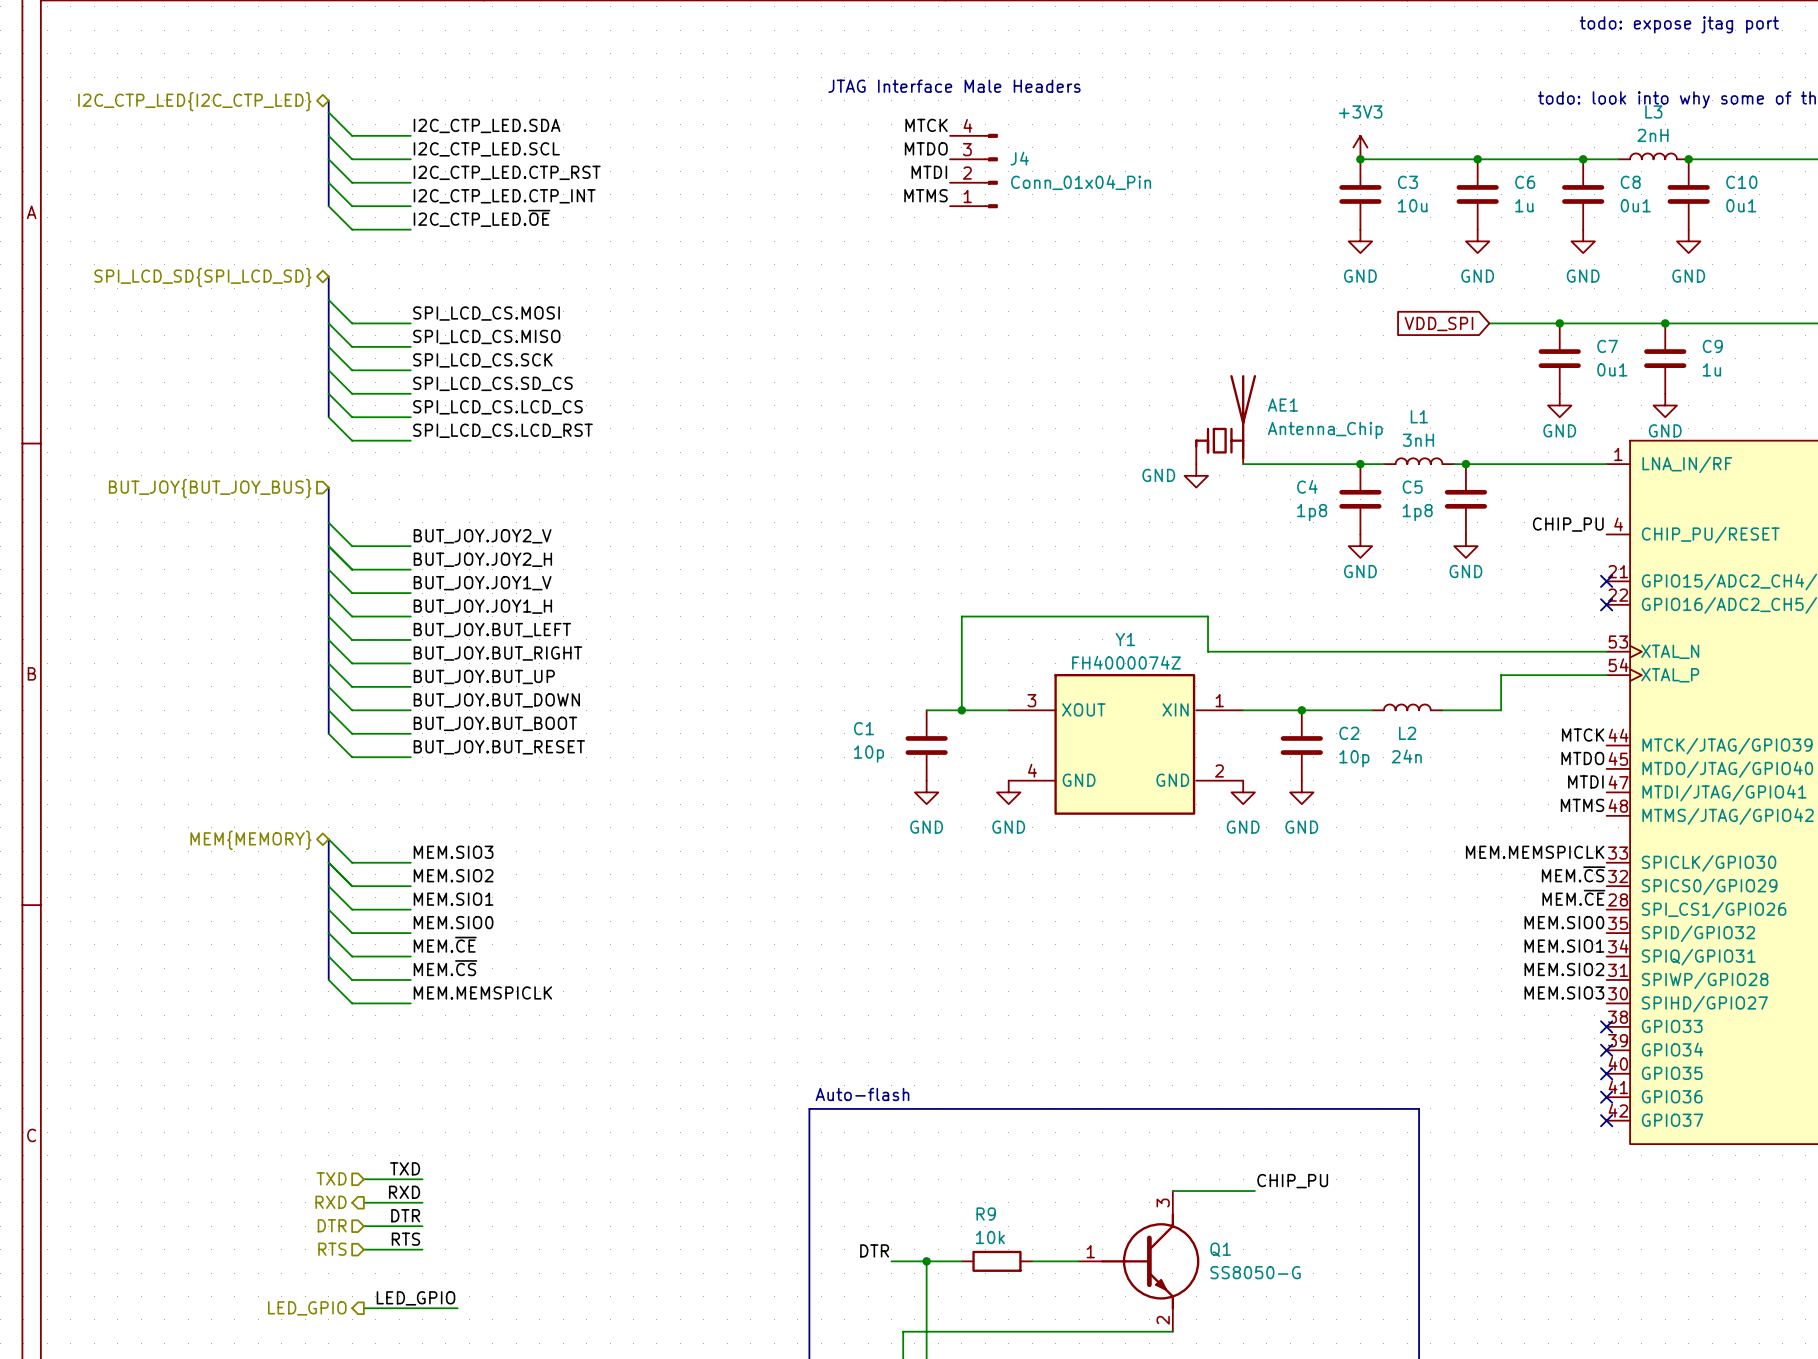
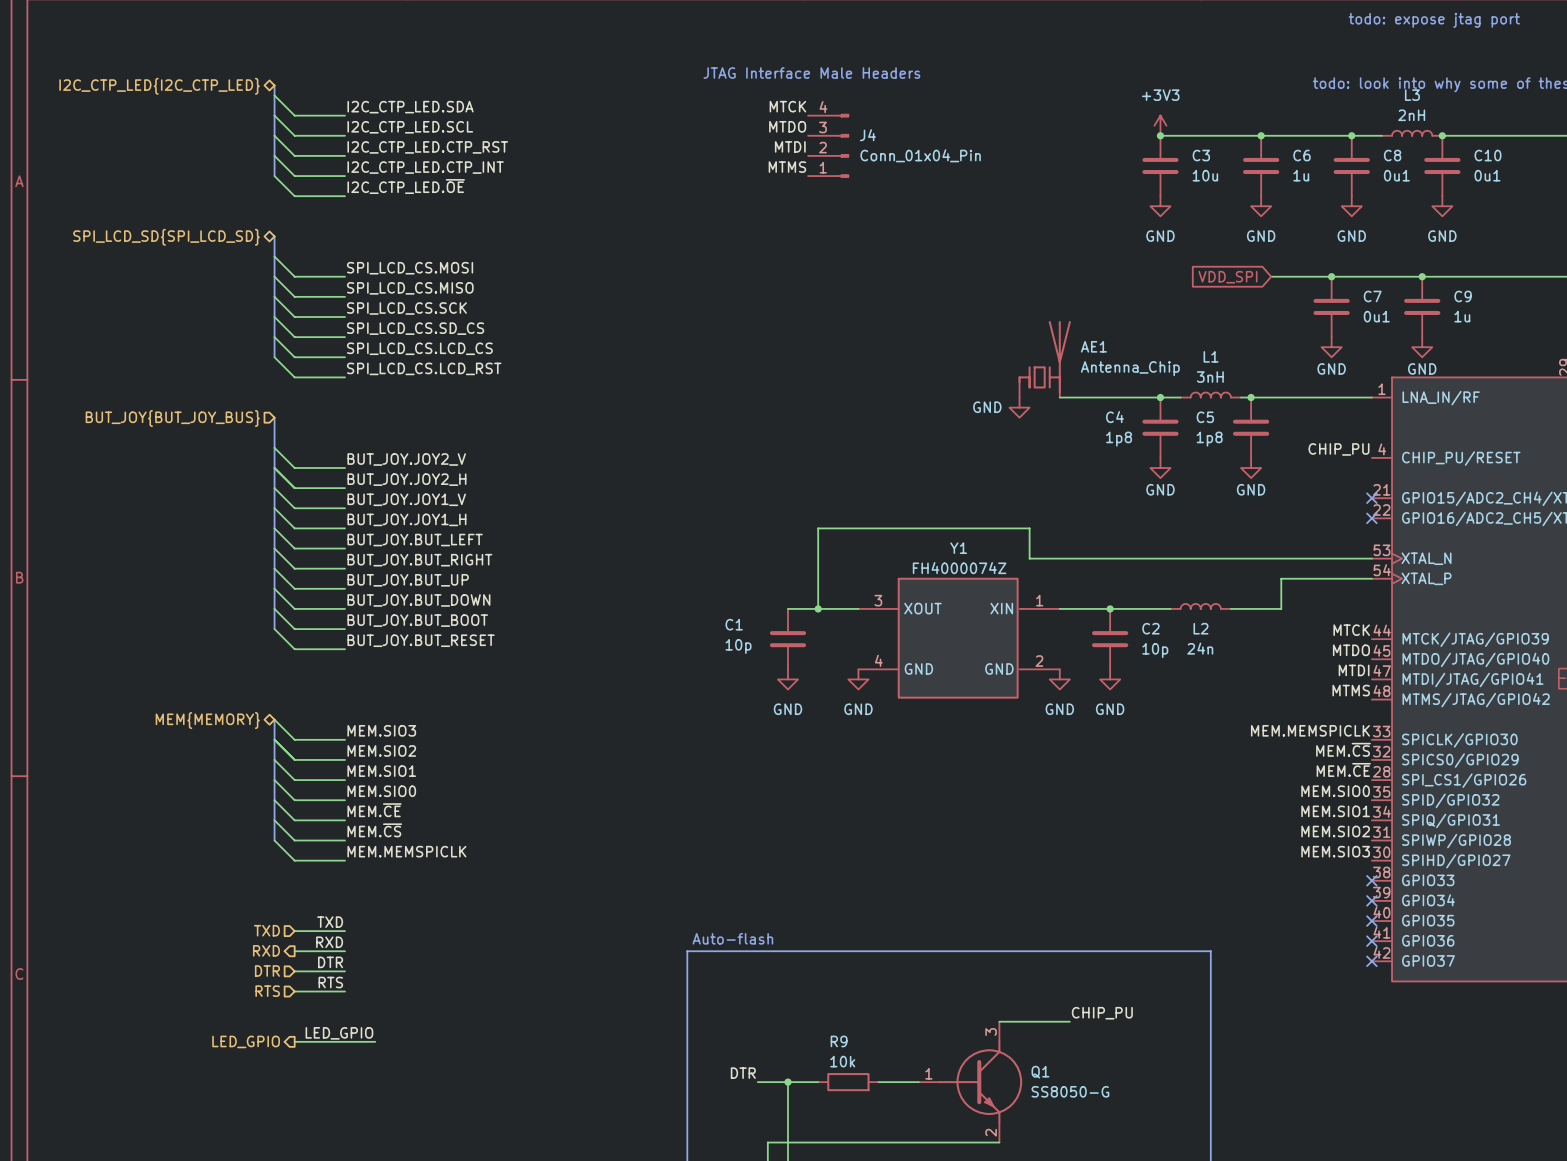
label position: TXD (405, 1168) -> TXD (330, 922)
hierarchical label position: TXD (331, 1178) -> TXD (266, 930)
wire: (363, 1179) (422, 1179) -> (294, 931) (345, 931)
label position: RXD (404, 1192) -> RXD (329, 942)
hierarchical label position: RXD (331, 1202) -> RXD (266, 950)
wire: (363, 1202) (422, 1202) -> (294, 951) (345, 951)
label position: DTR (405, 1215) -> DTR (330, 962)
hierarchical label position: DTR (332, 1225) -> DTR (267, 971)
wire: (363, 1226) (422, 1226) -> (294, 971) (345, 971)
label position: RTS (405, 1239) -> RTS (330, 982)
hierarchical label position: RTS (332, 1249) -> RTS (267, 991)
wire: (363, 1249) (422, 1249) -> (294, 991) (345, 991)
label position: LED_GPIO (415, 1298) -> LED_GPIO (339, 1033)
hierarchical label position: LED_GPIO (307, 1308) -> LED_GPIO (246, 1041)
wire: (363, 1308) (457, 1308) -> (294, 1041) (375, 1041)

